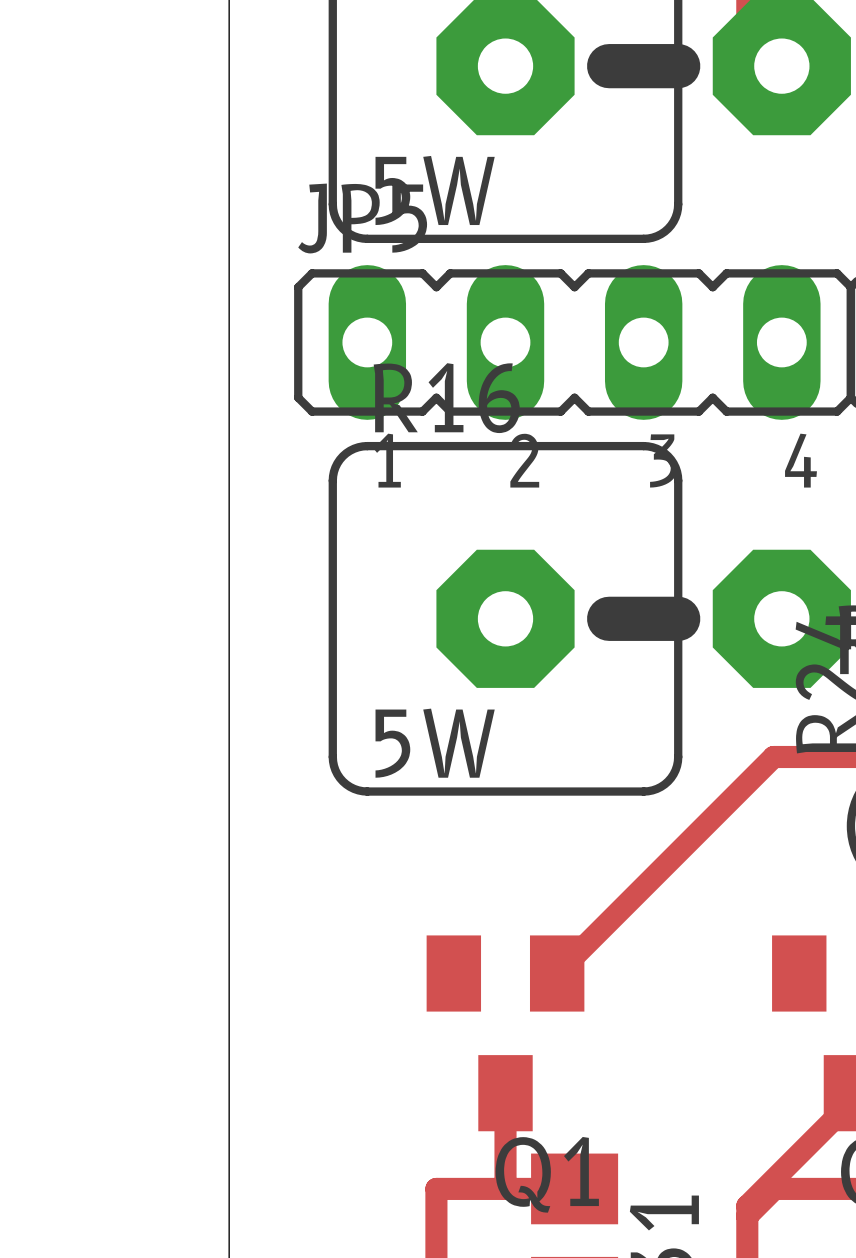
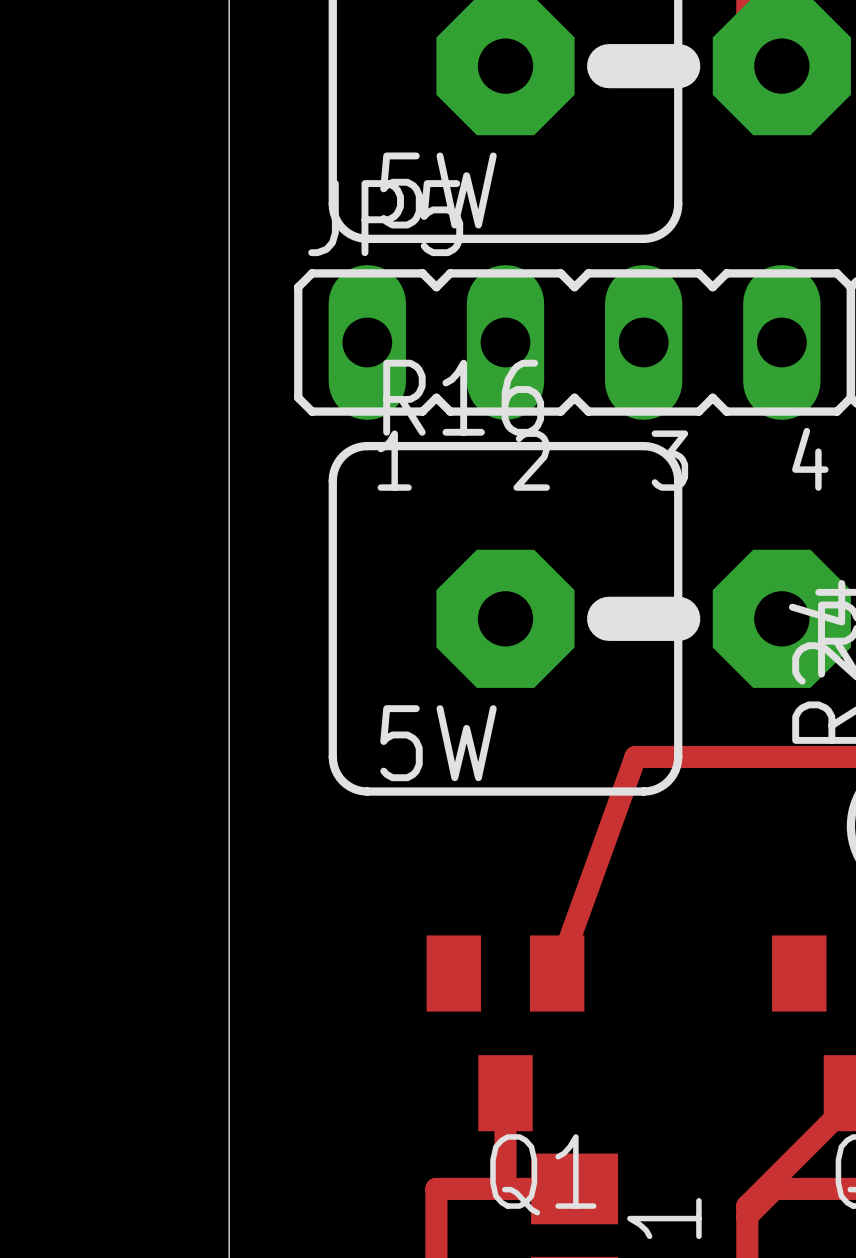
track: (773, 756) (557, 973) -> (773, 756) (635, 756) (557, 973)

